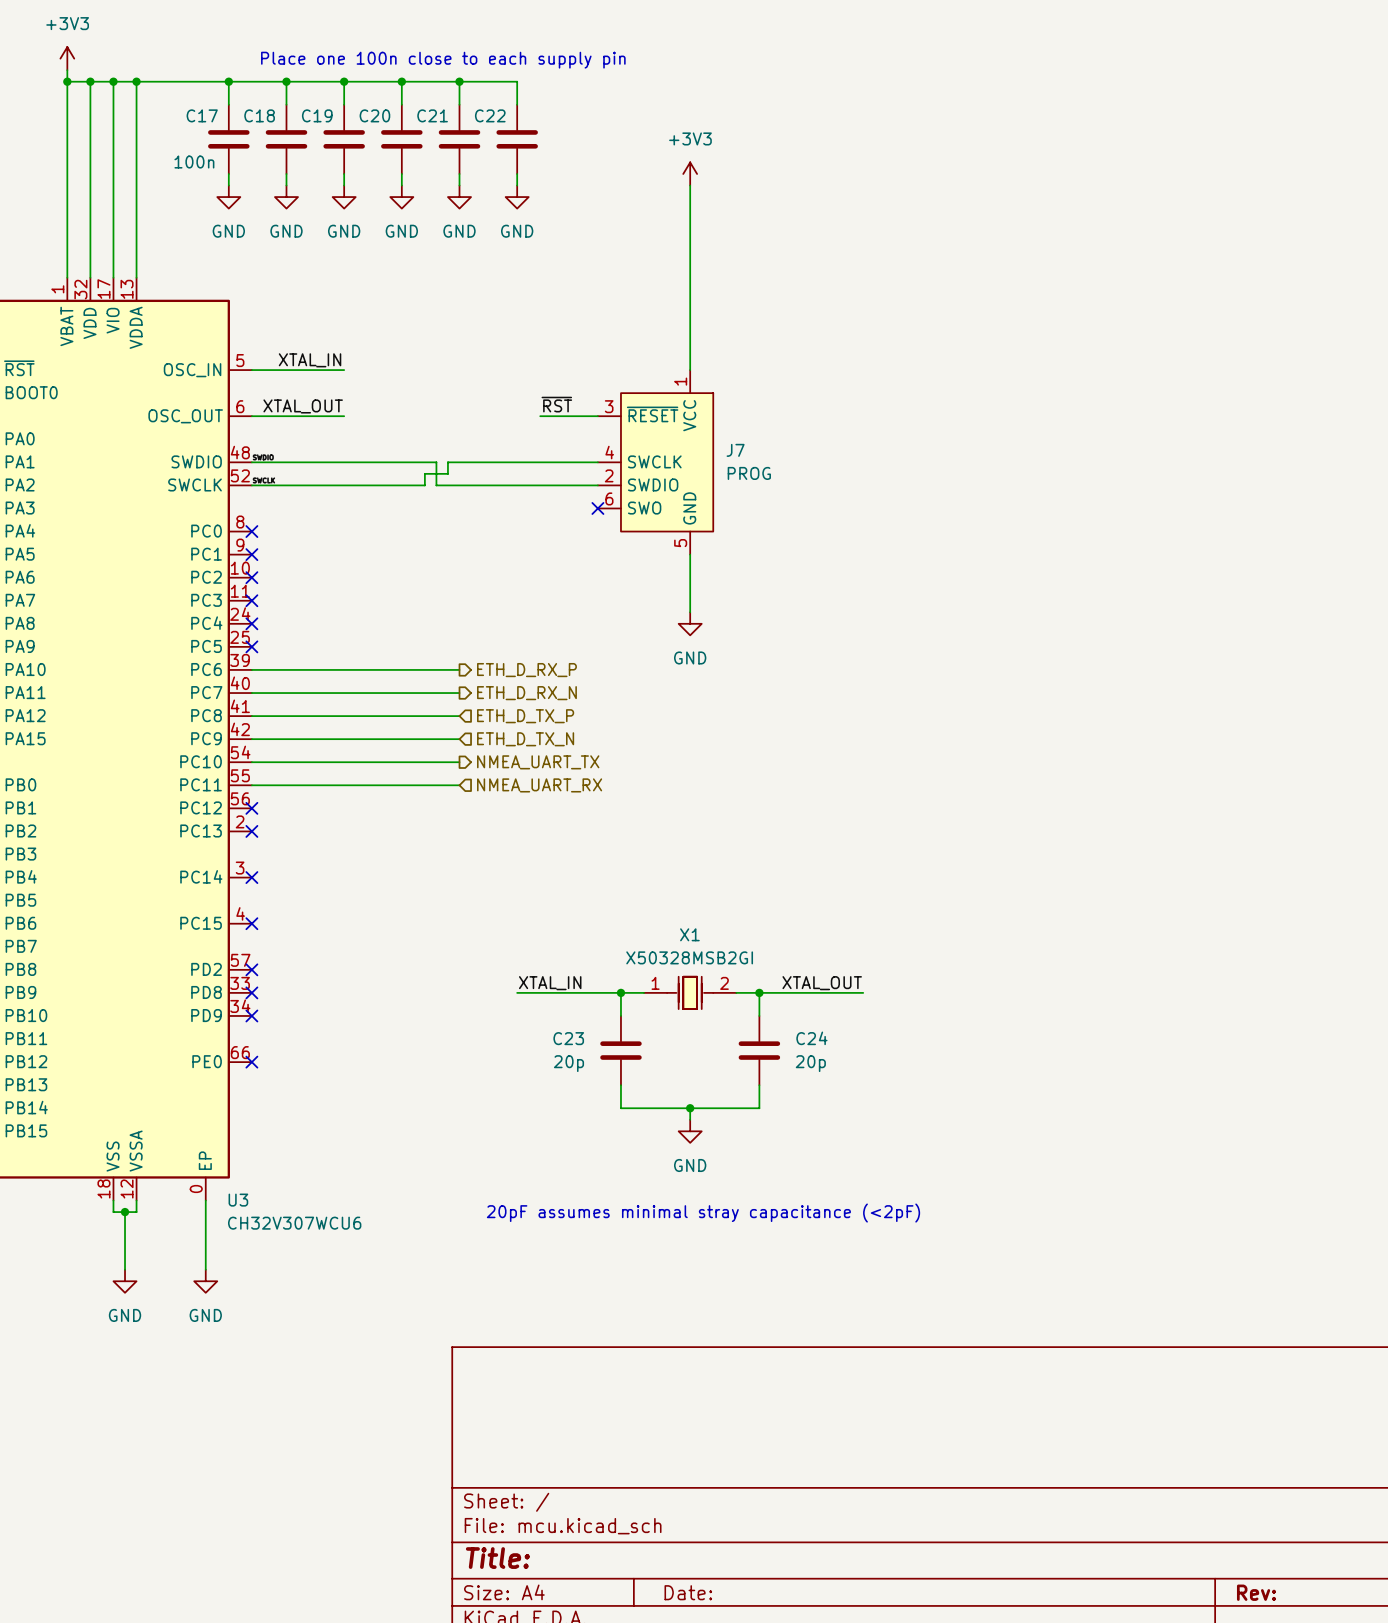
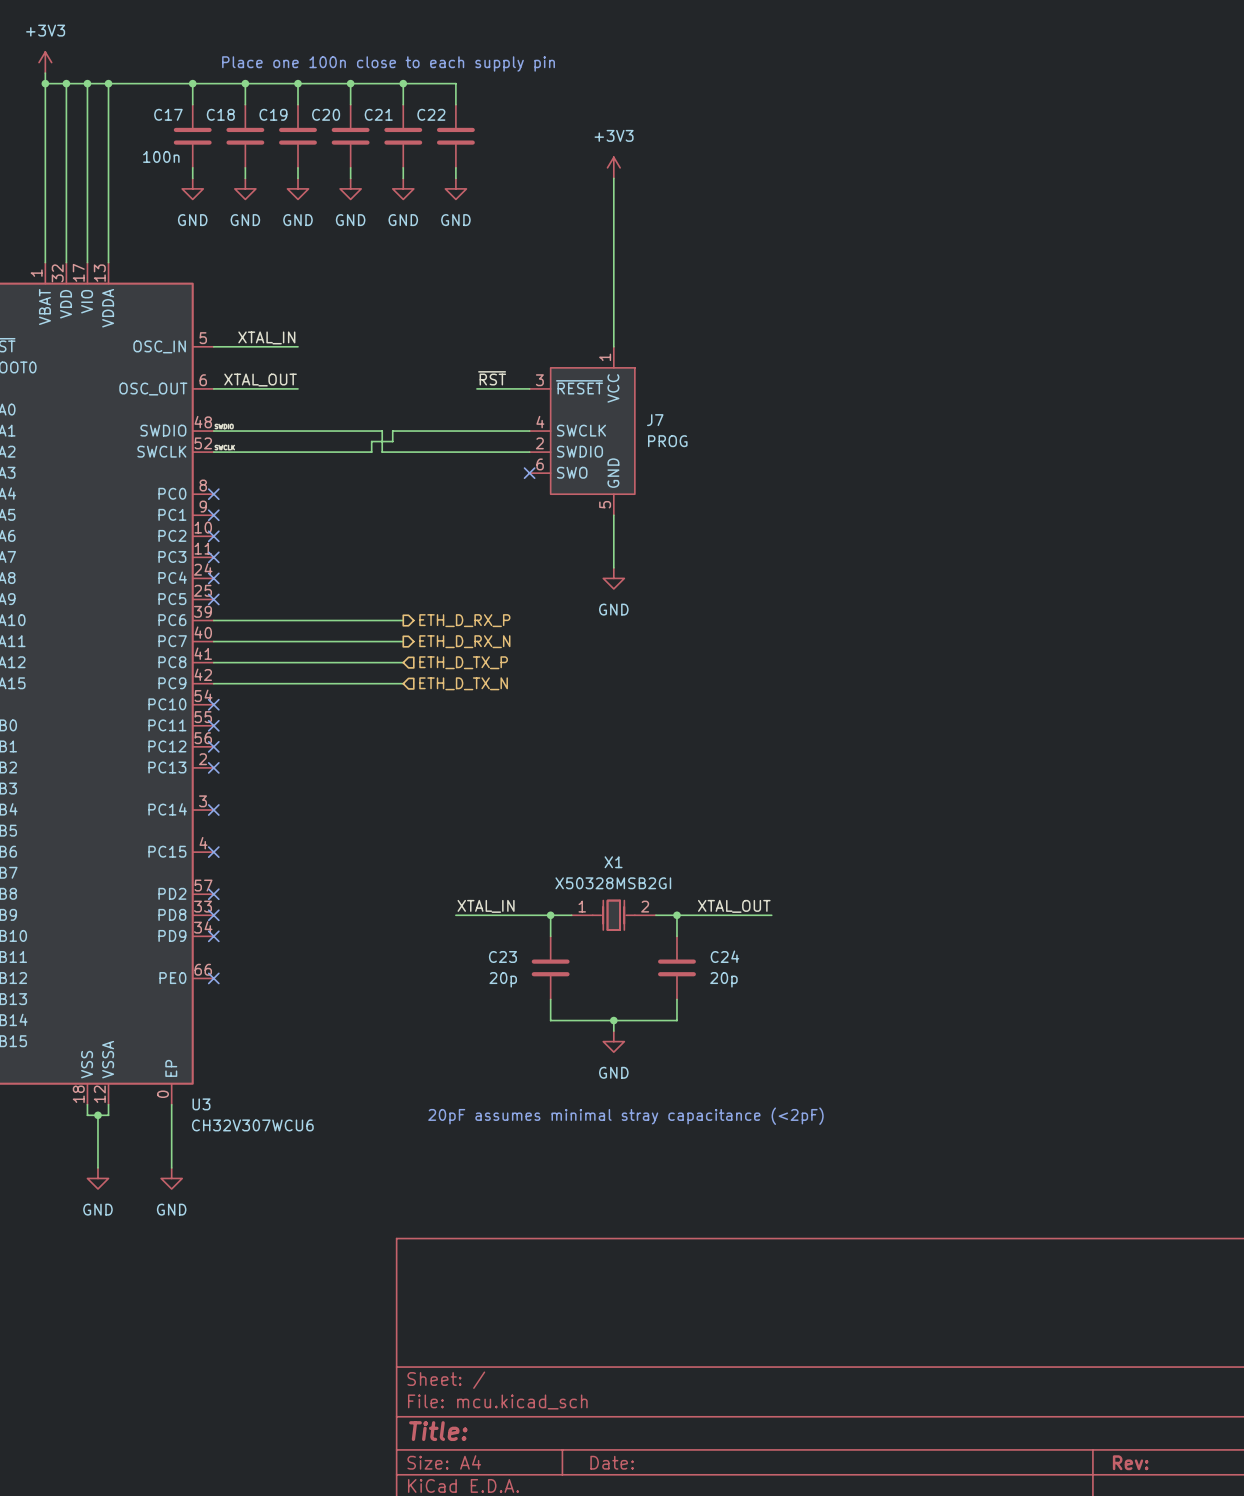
wire: (251, 762) (459, 762) -> none
no-connect mark: none -> (213, 704)
hierarchical label: NMEA_UART_TX (538, 762) -> none
wire: (251, 785) (459, 785) -> none
no-connect mark: none -> (213, 725)
hierarchical label: NMEA_UART_RX (539, 785) -> none

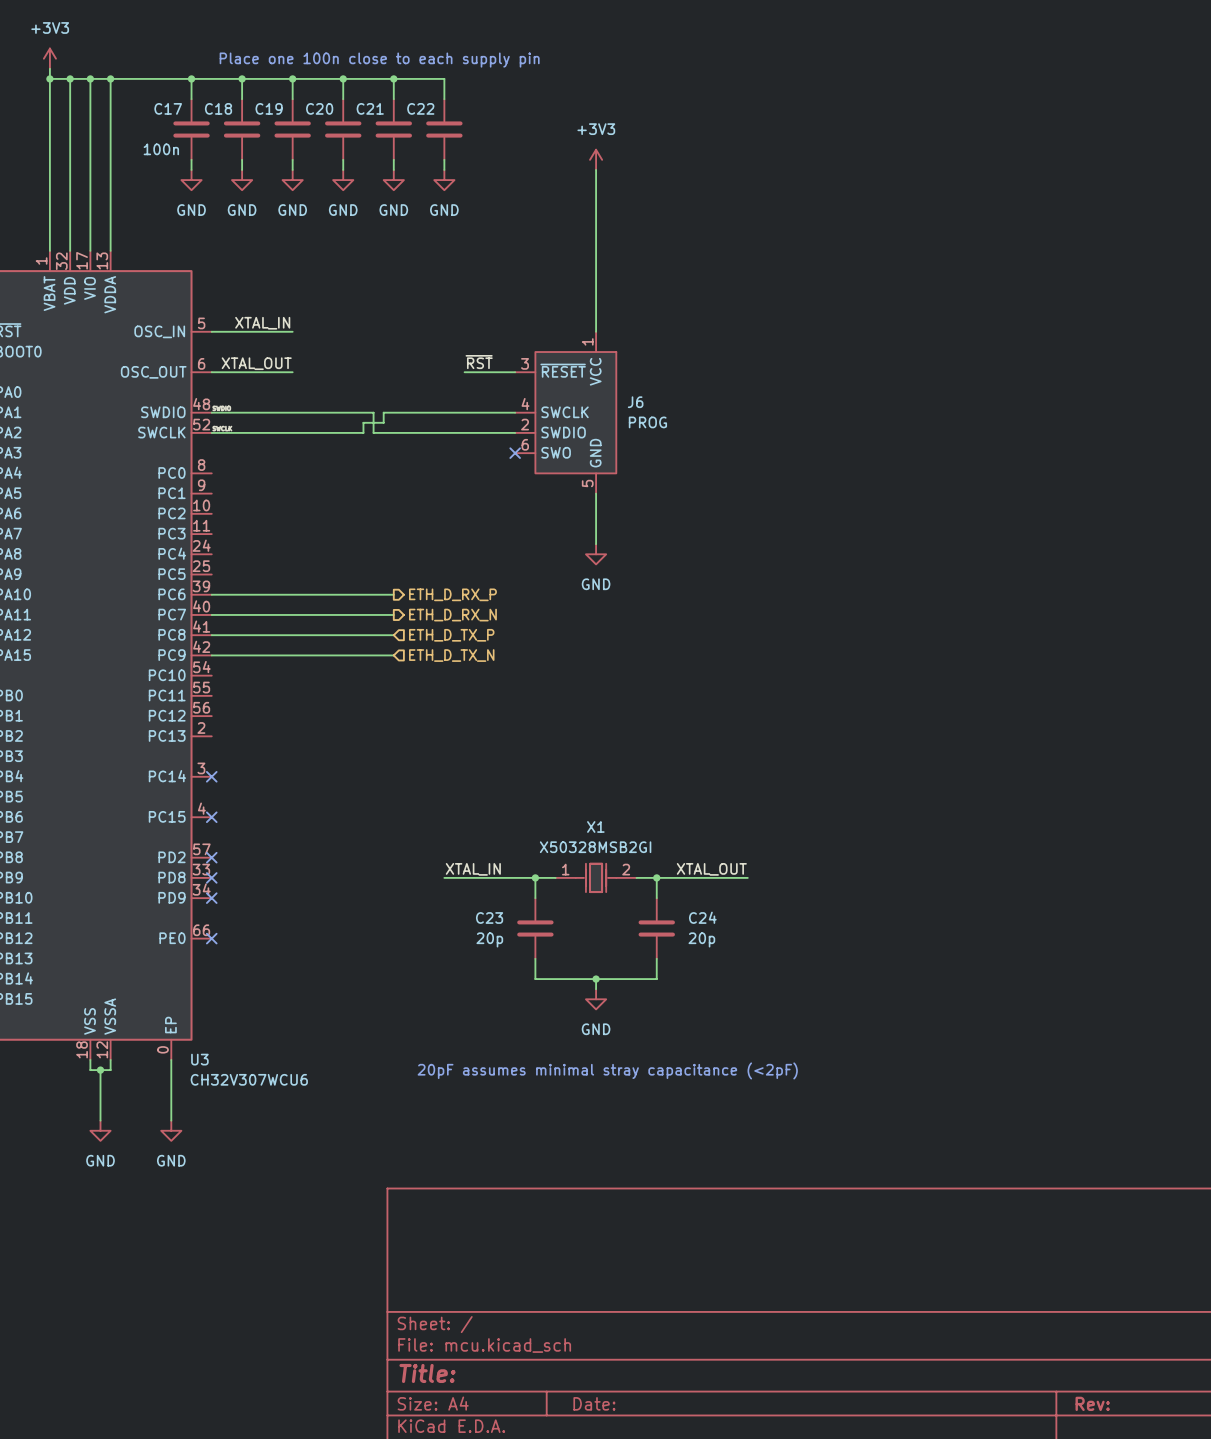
J7 name: J7 (655, 420) -> J6 (635, 402)
no-connect mark: (213, 494) -> none
no-connect mark: (213, 515) -> none
no-connect mark: (213, 536) -> none
no-connect mark: (213, 557) -> none
no-connect mark: (213, 578) -> none
no-connect mark: (213, 599) -> none
no-connect mark: (213, 704) -> none
no-connect mark: (213, 725) -> none
no-connect mark: (213, 746) -> none
no-connect mark: (213, 767) -> none

